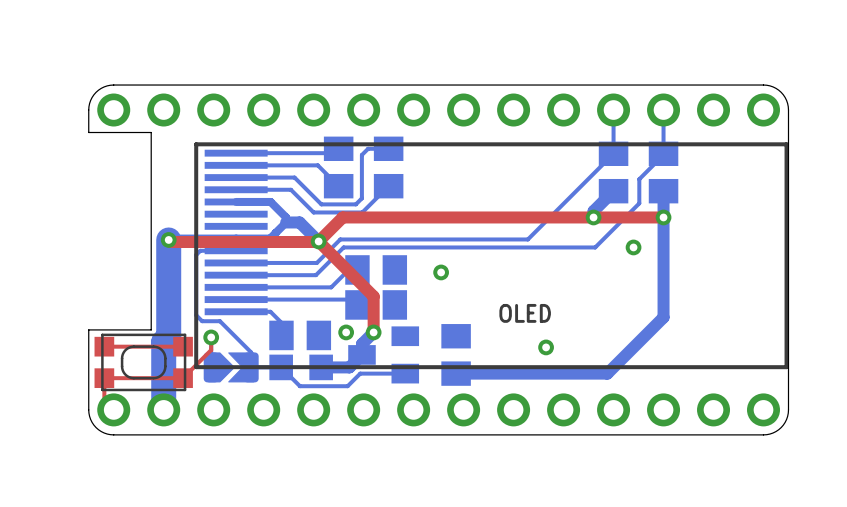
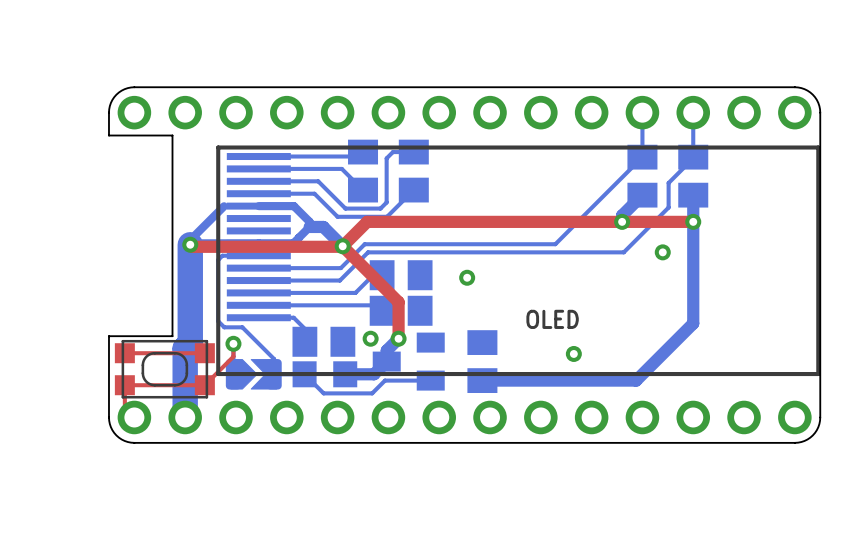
bottom track: none -> (224, 206) (190, 240)

